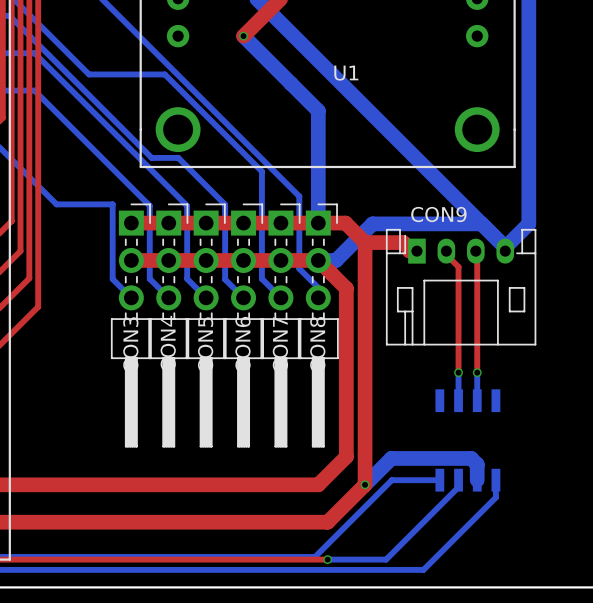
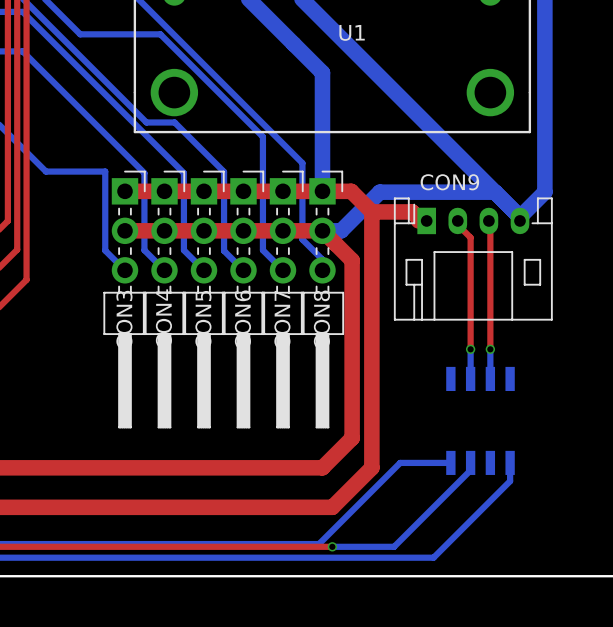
bottom track: (477, 480) (477, 464) (471, 458) (391, 458) (365, 484) -> none
via: (365, 484) -> none

